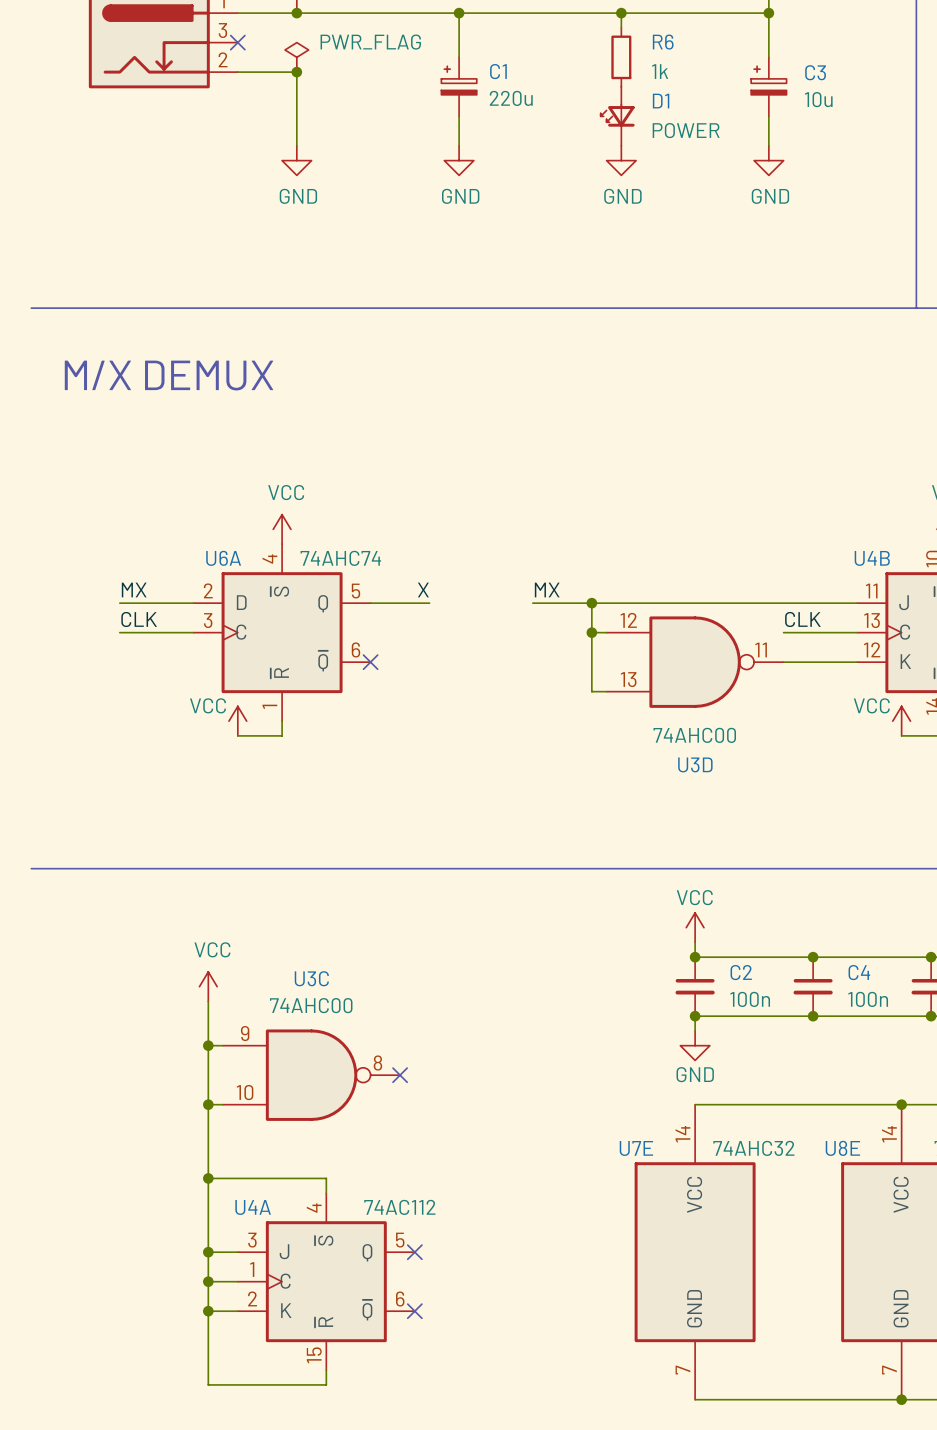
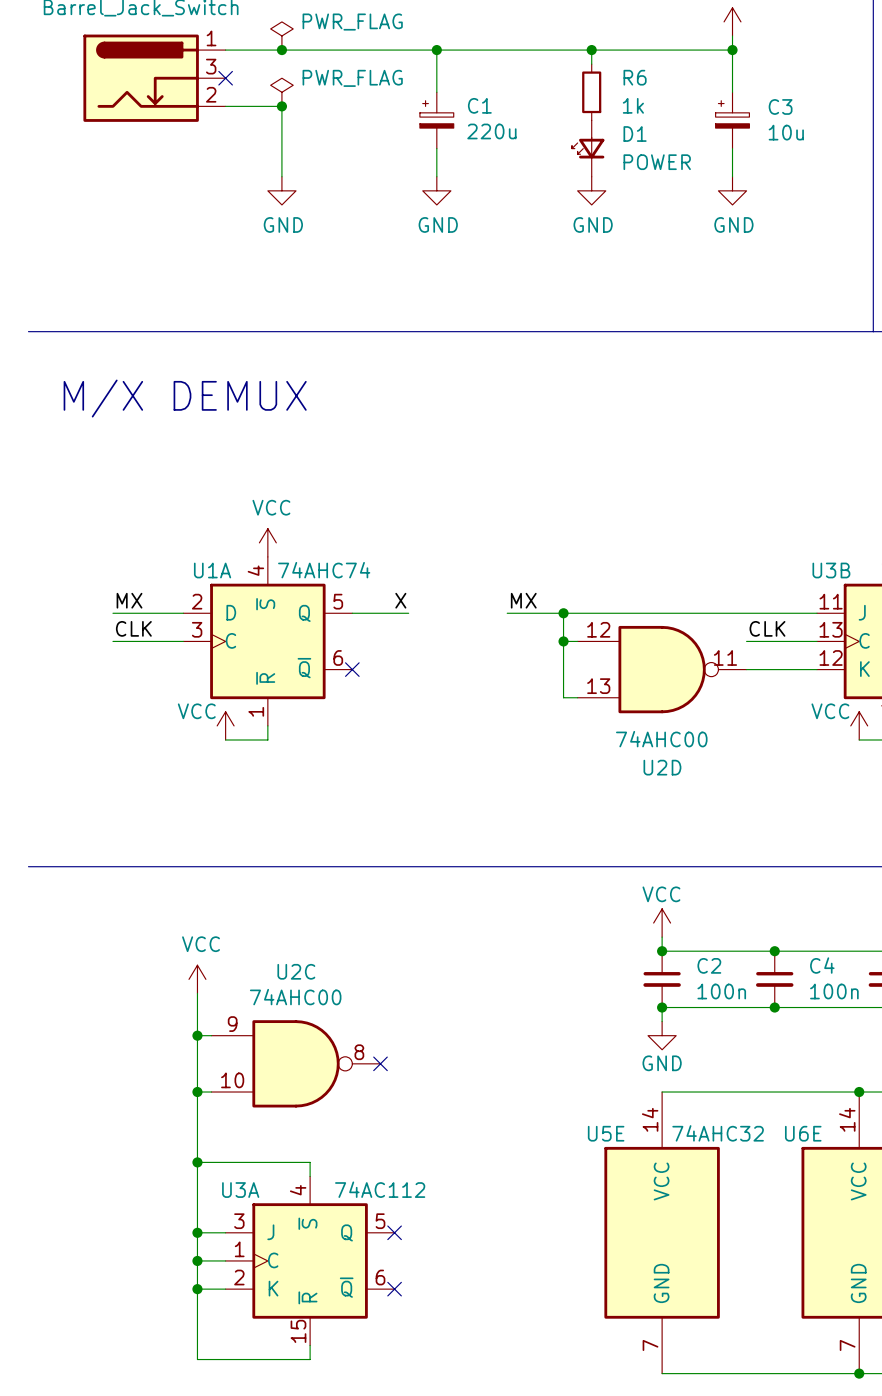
U6A name: U6A (223, 558) -> U1A (212, 570)
U4B name: U4B (872, 558) -> U3B (831, 570)
U3D name: U3D (695, 764) -> U2D (662, 767)
U3C name: U3C (311, 978) -> U2C (296, 971)
U7E name: U7E (636, 1148) -> U5E (606, 1133)
U8E name: U8E (842, 1148) -> U6E (803, 1133)
U4A name: U4A (253, 1207) -> U3A (240, 1190)

